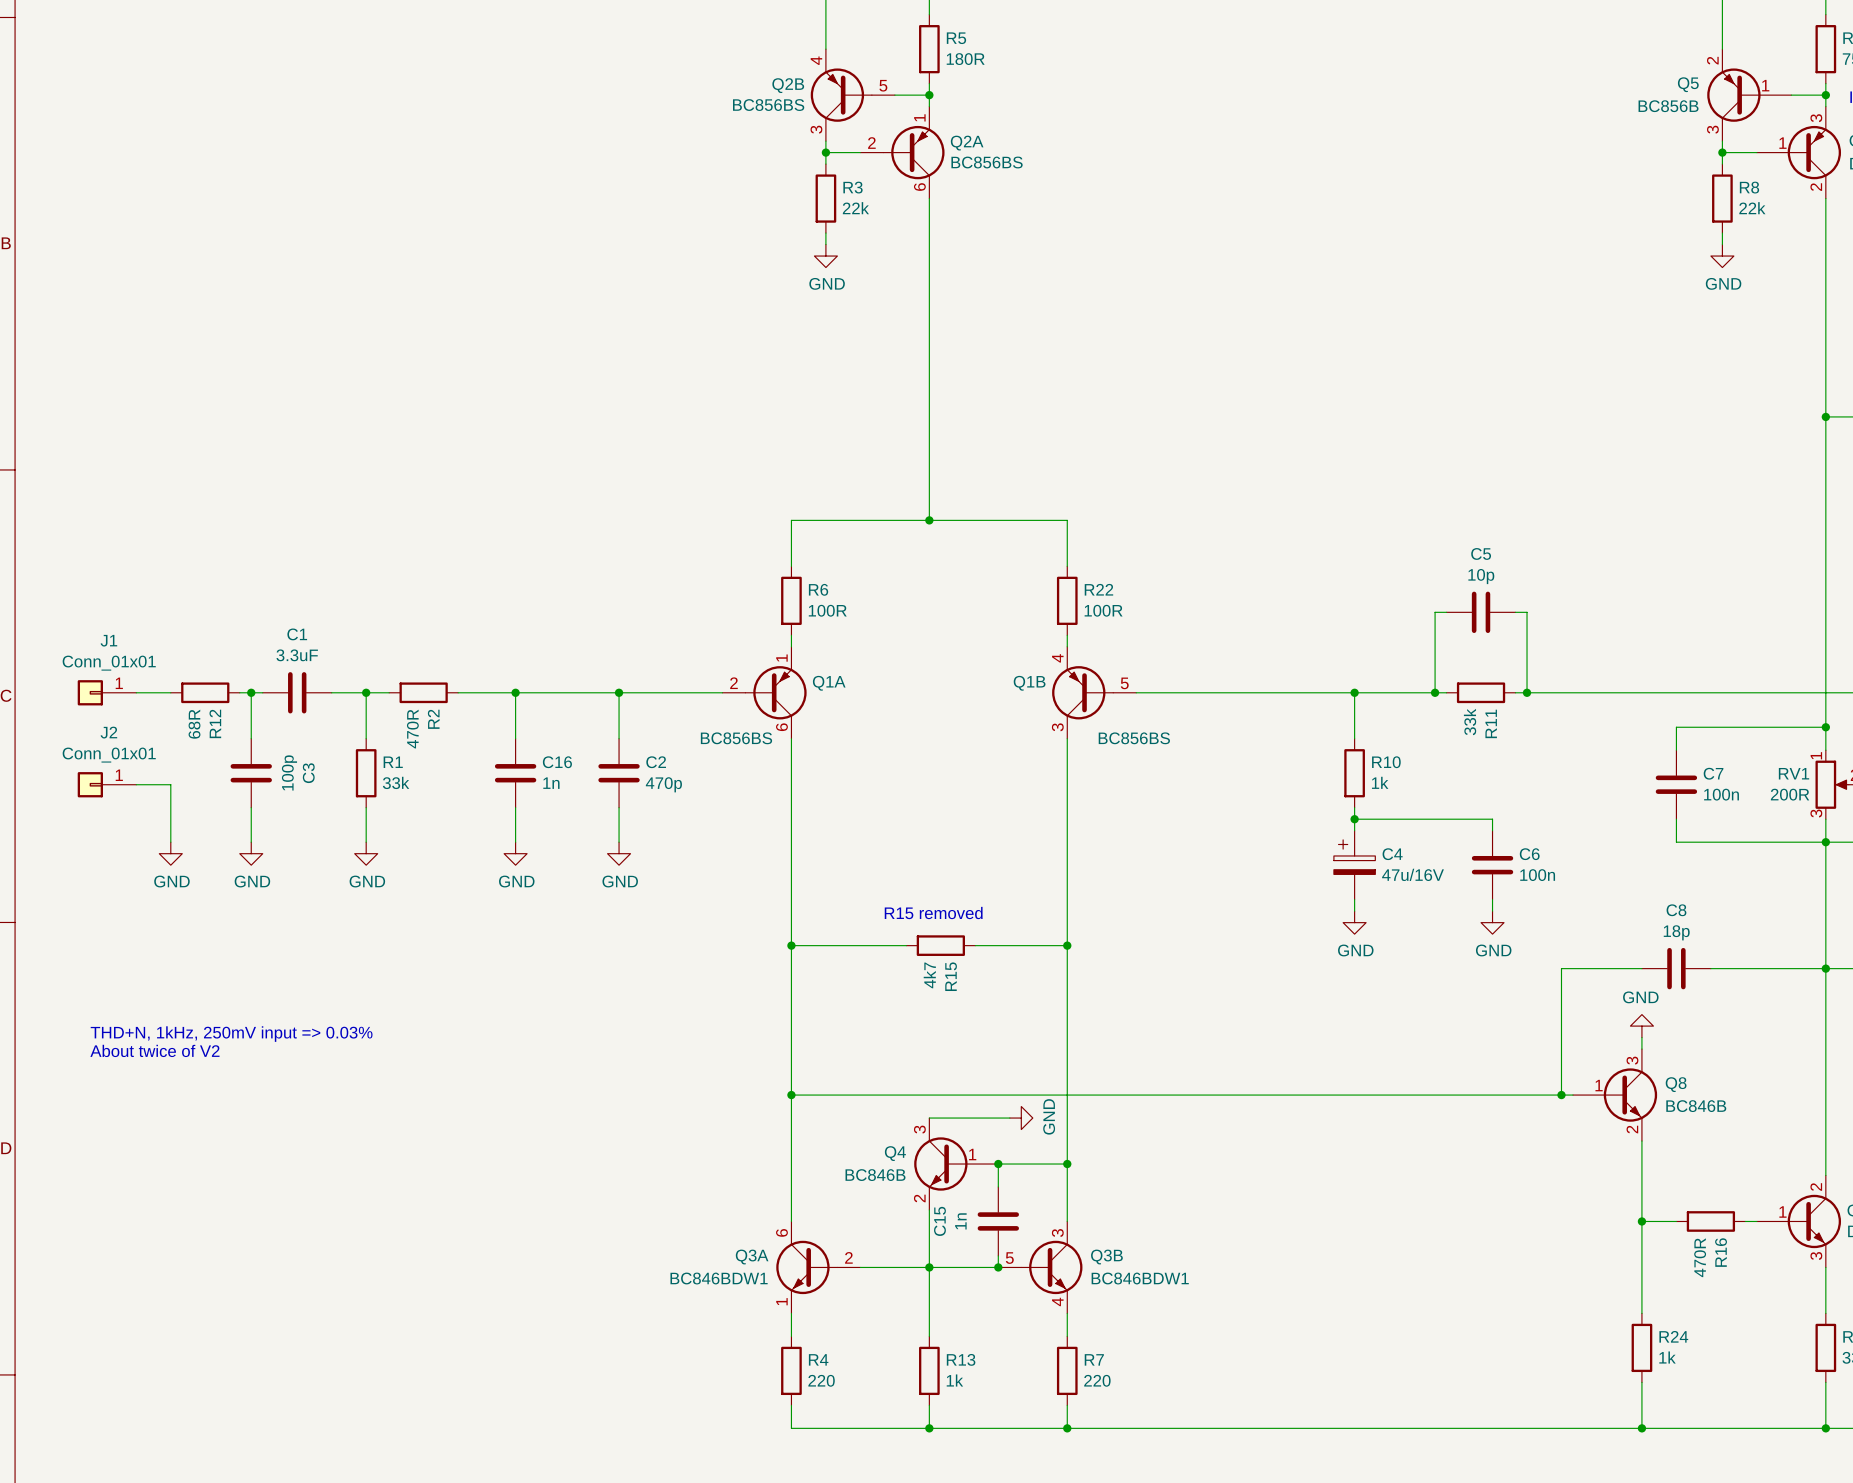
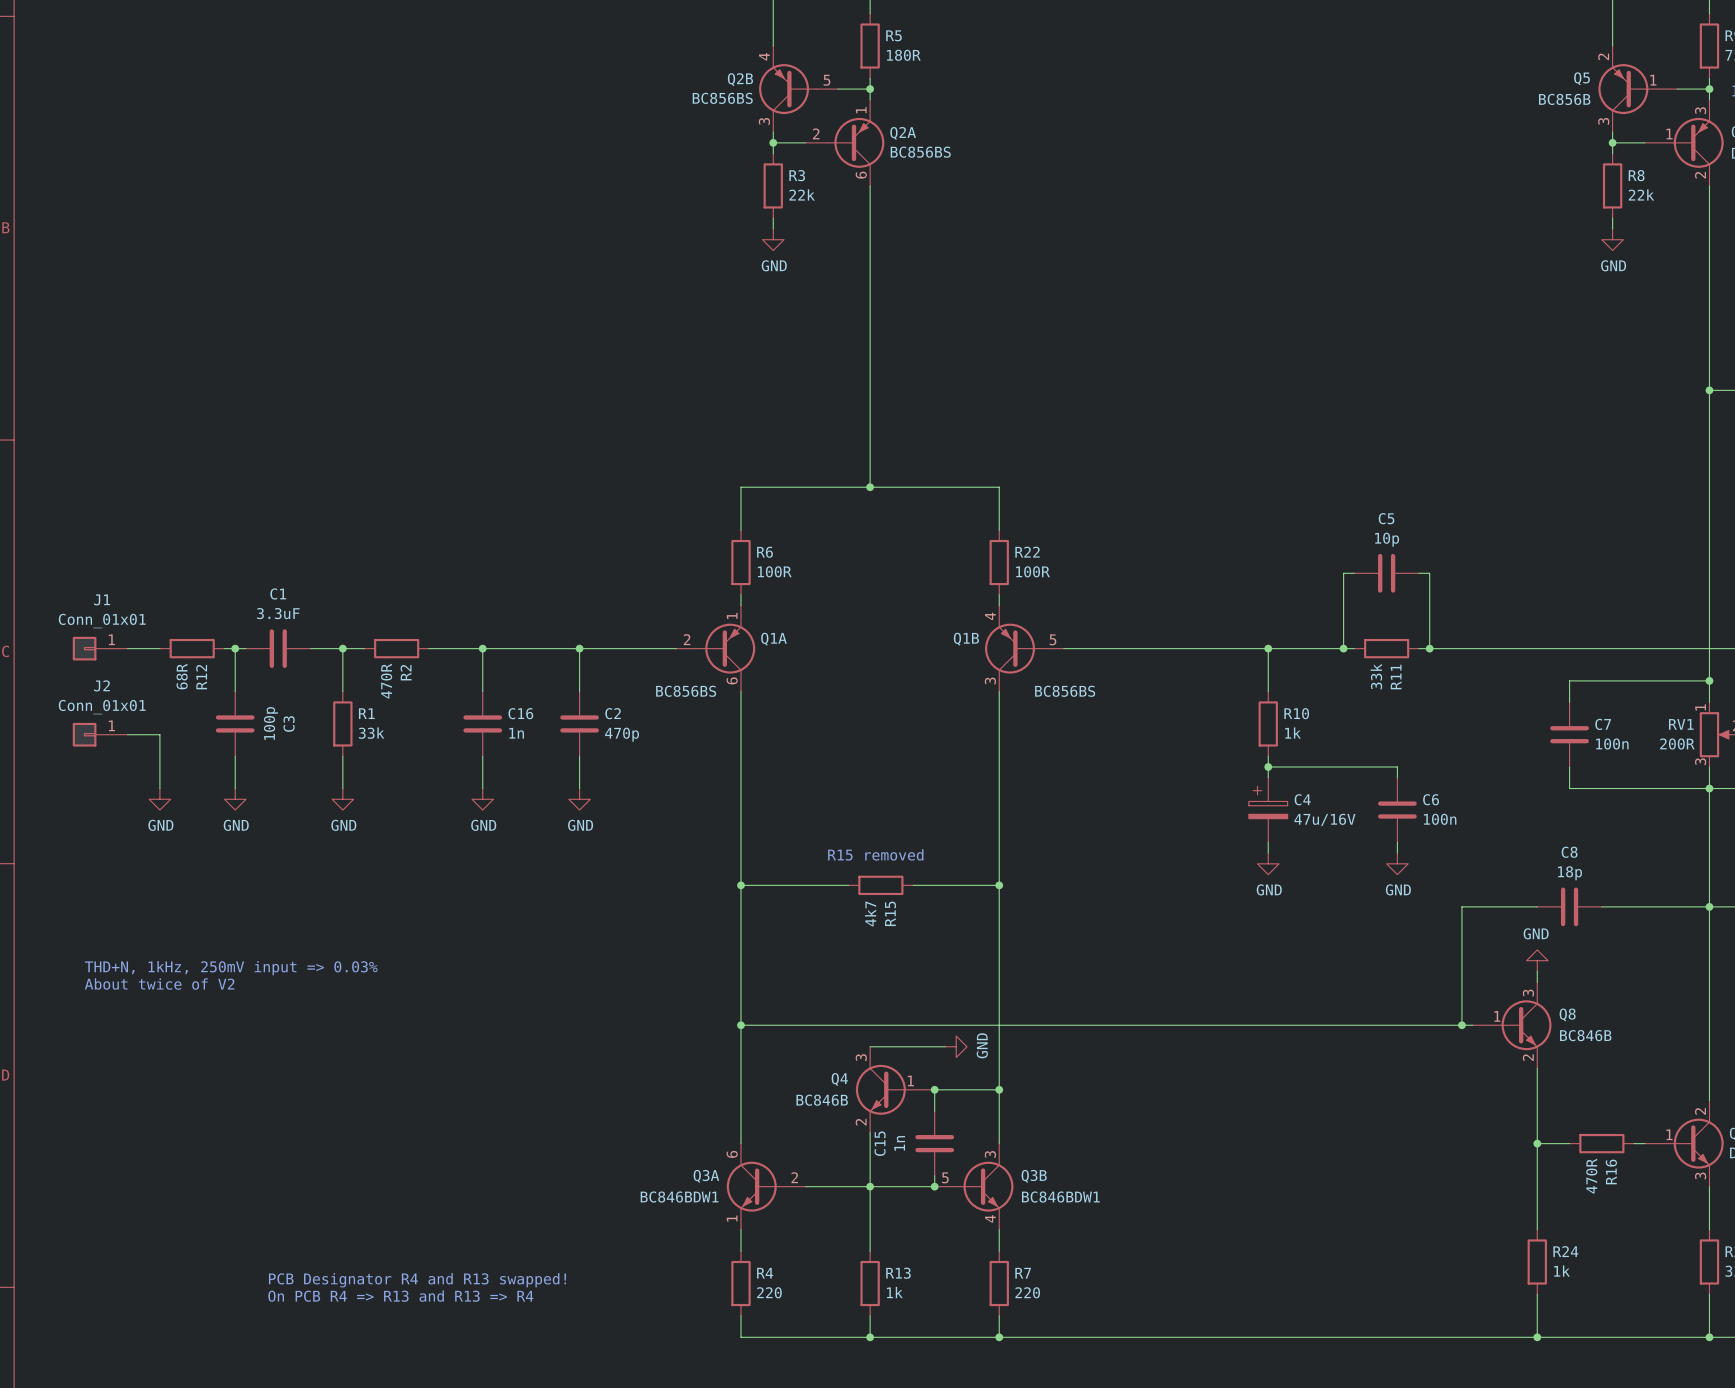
text: none -> PCB Designator R4 and R13 swapped! (417, 1280)
text: none -> On PCB R4 => R13 and R13 => R4 (400, 1296)

